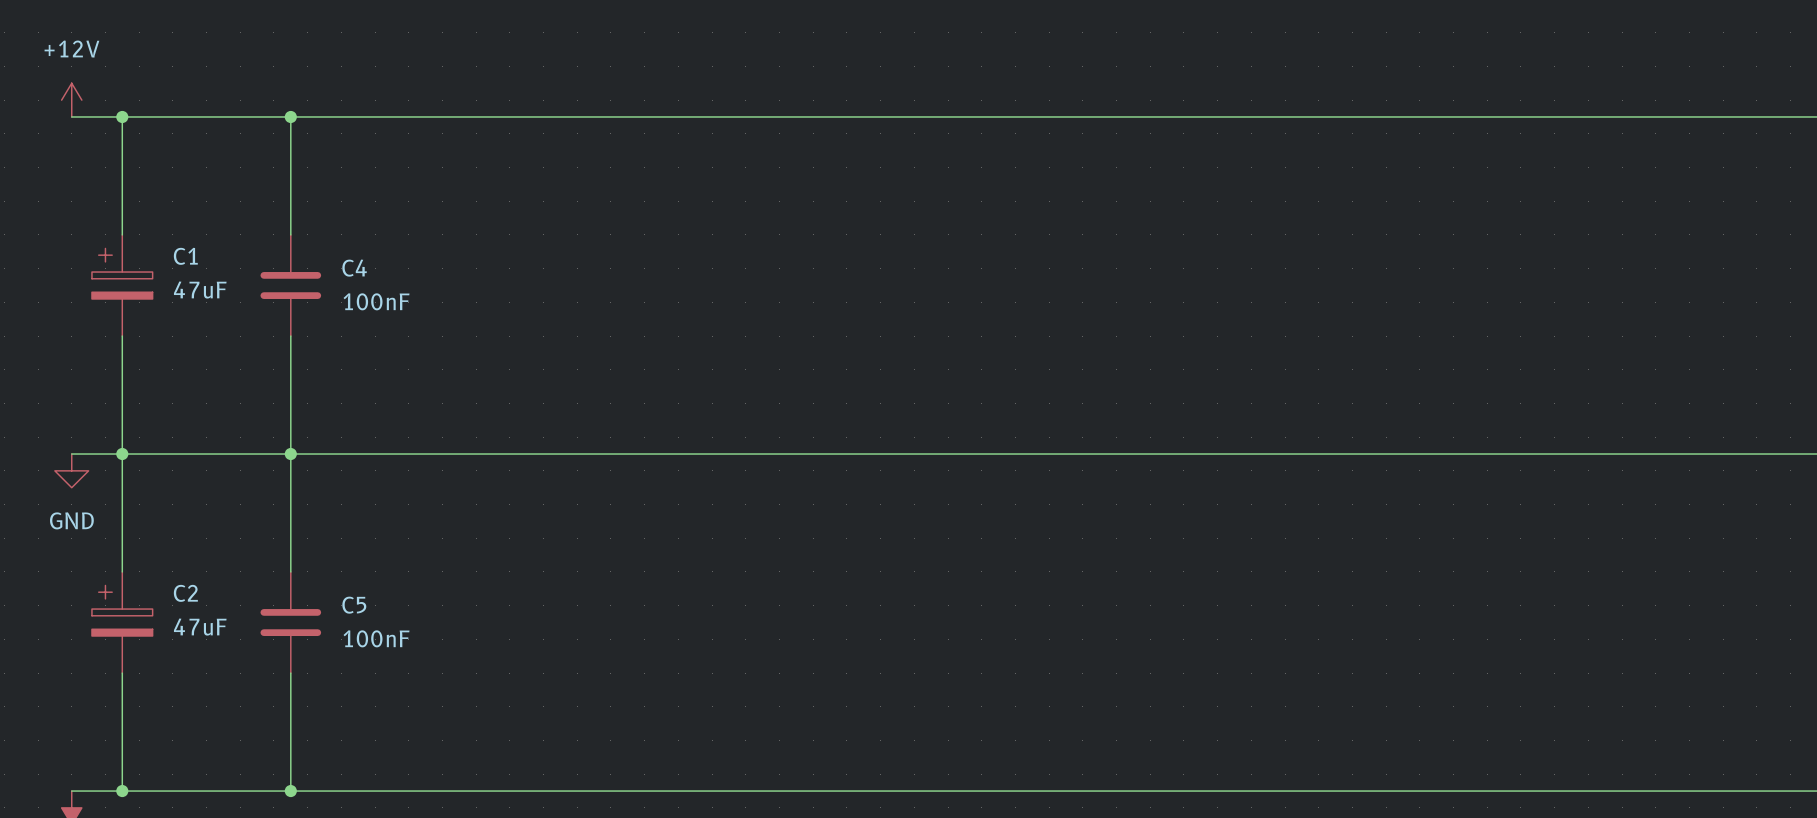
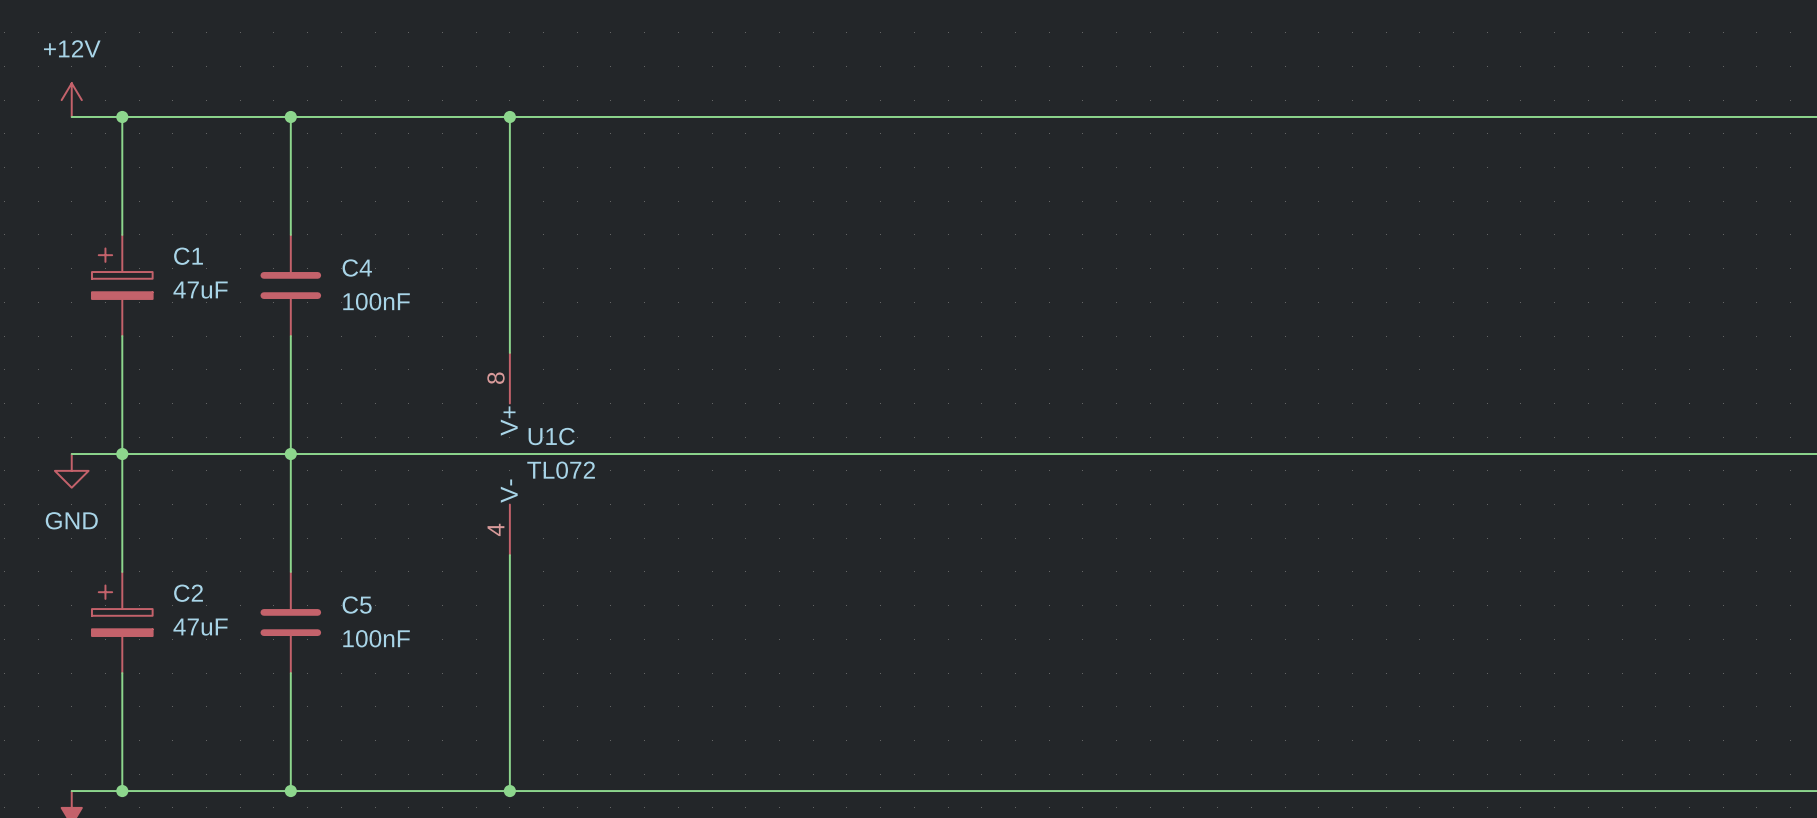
wire: none -> (509, 116) (509, 352)
junction: none -> (509, 116)
U1C: none -> TL072 (509, 454)
wire: none -> (509, 555) (509, 791)
junction: none -> (509, 791)

